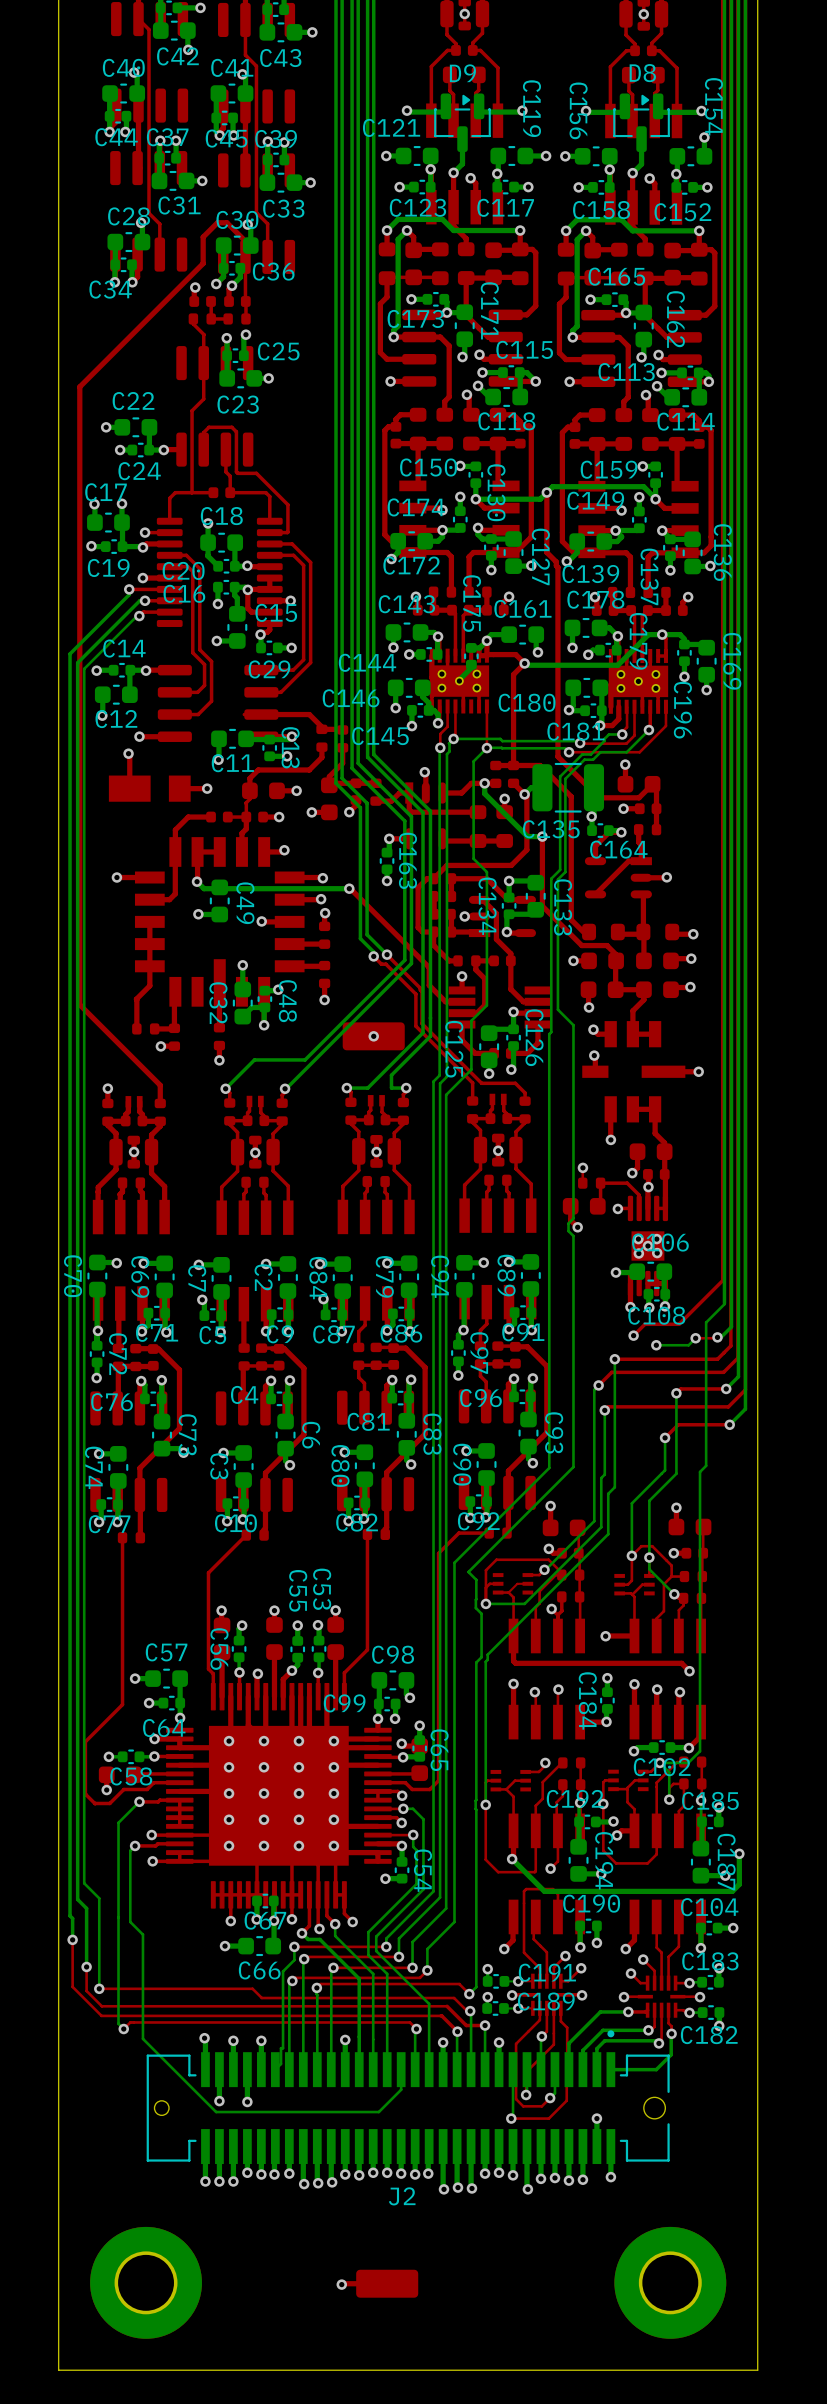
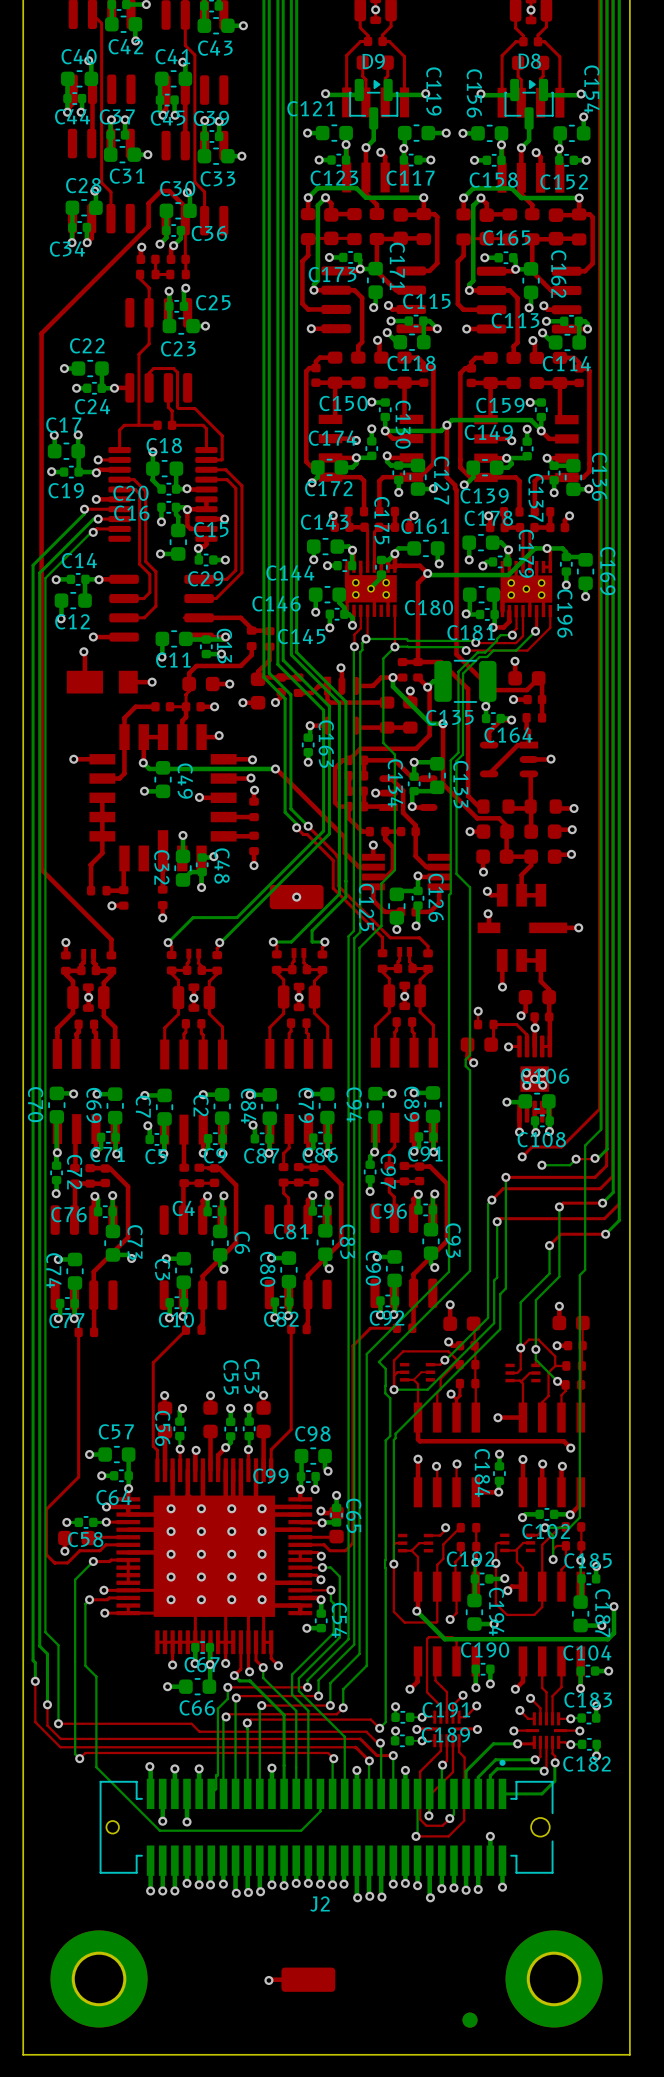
part: none -> (470, 2020)

